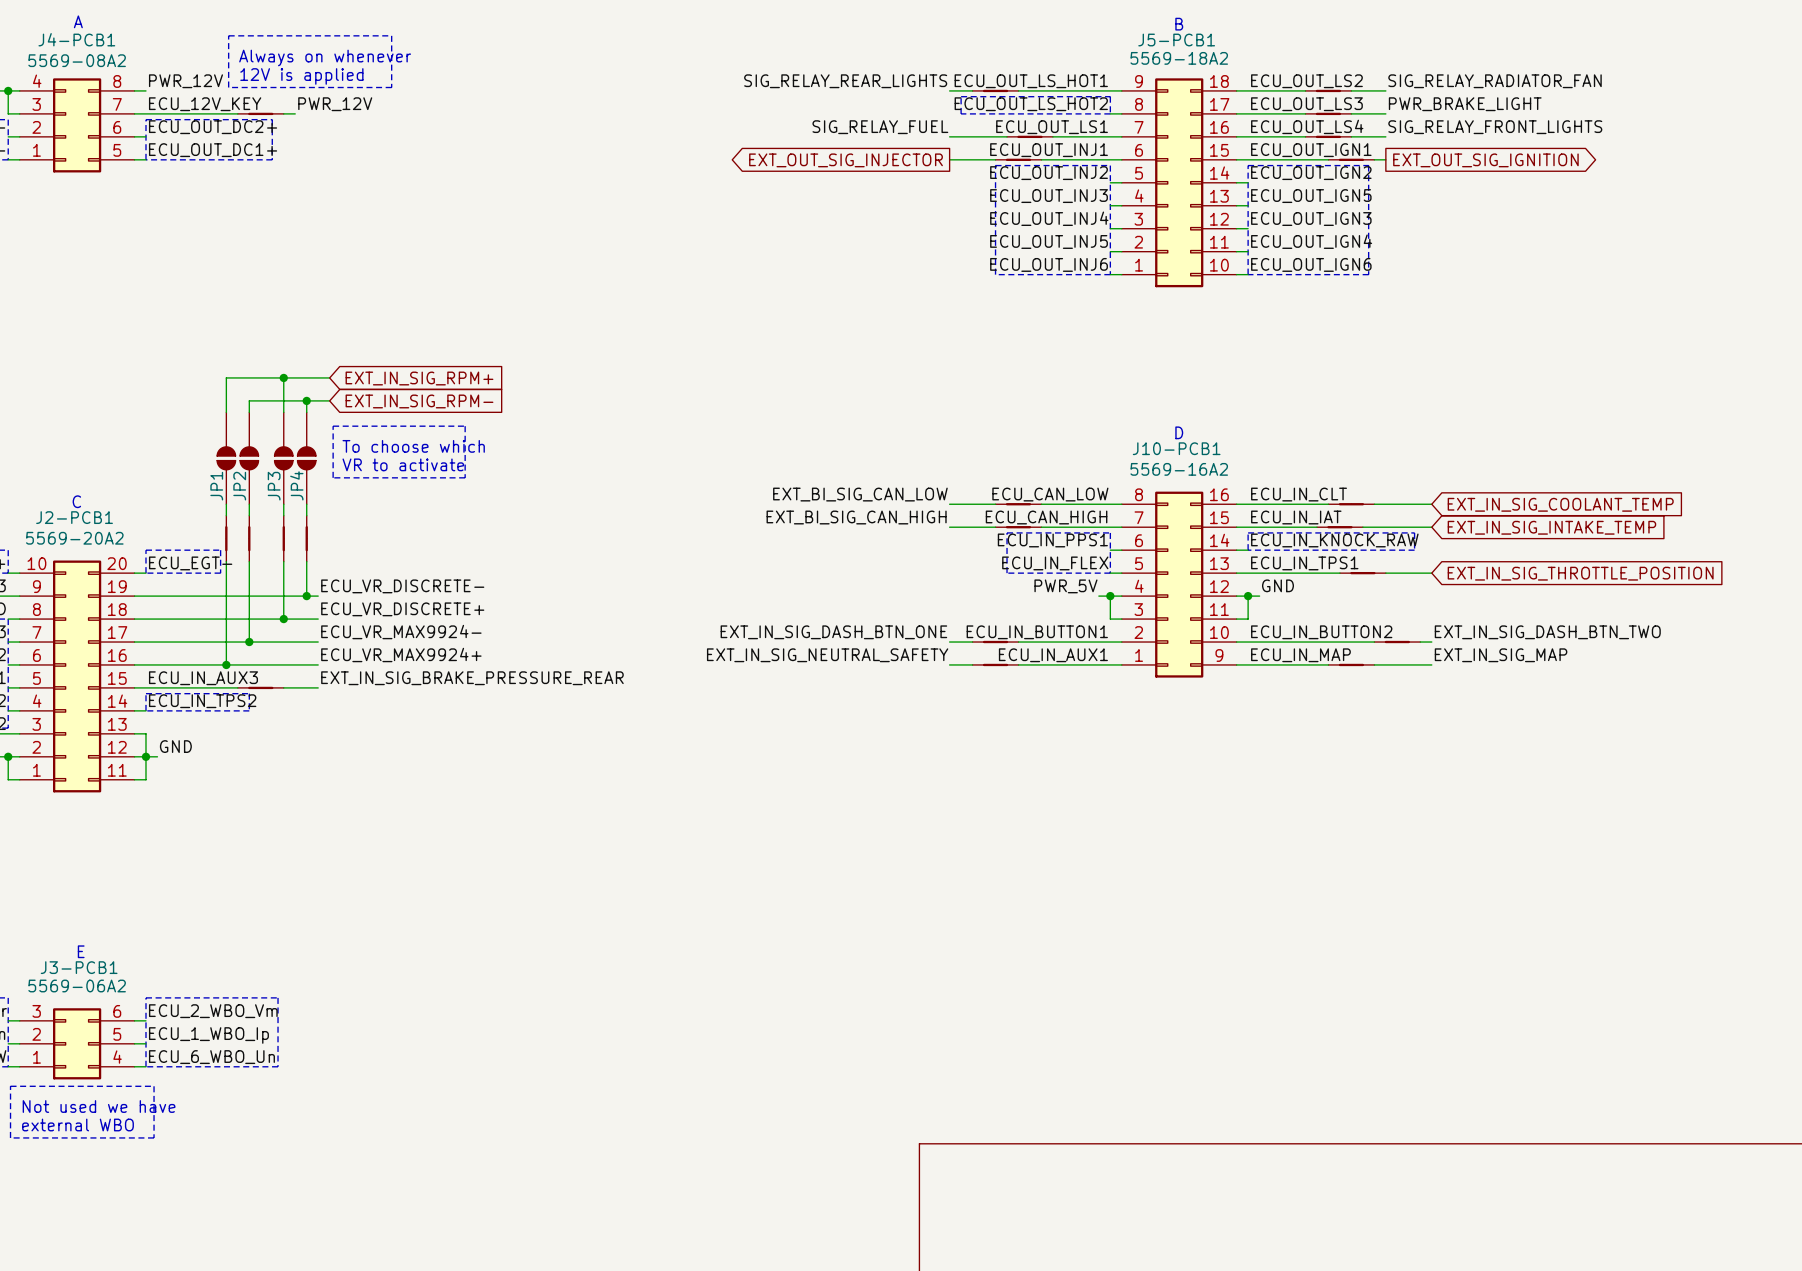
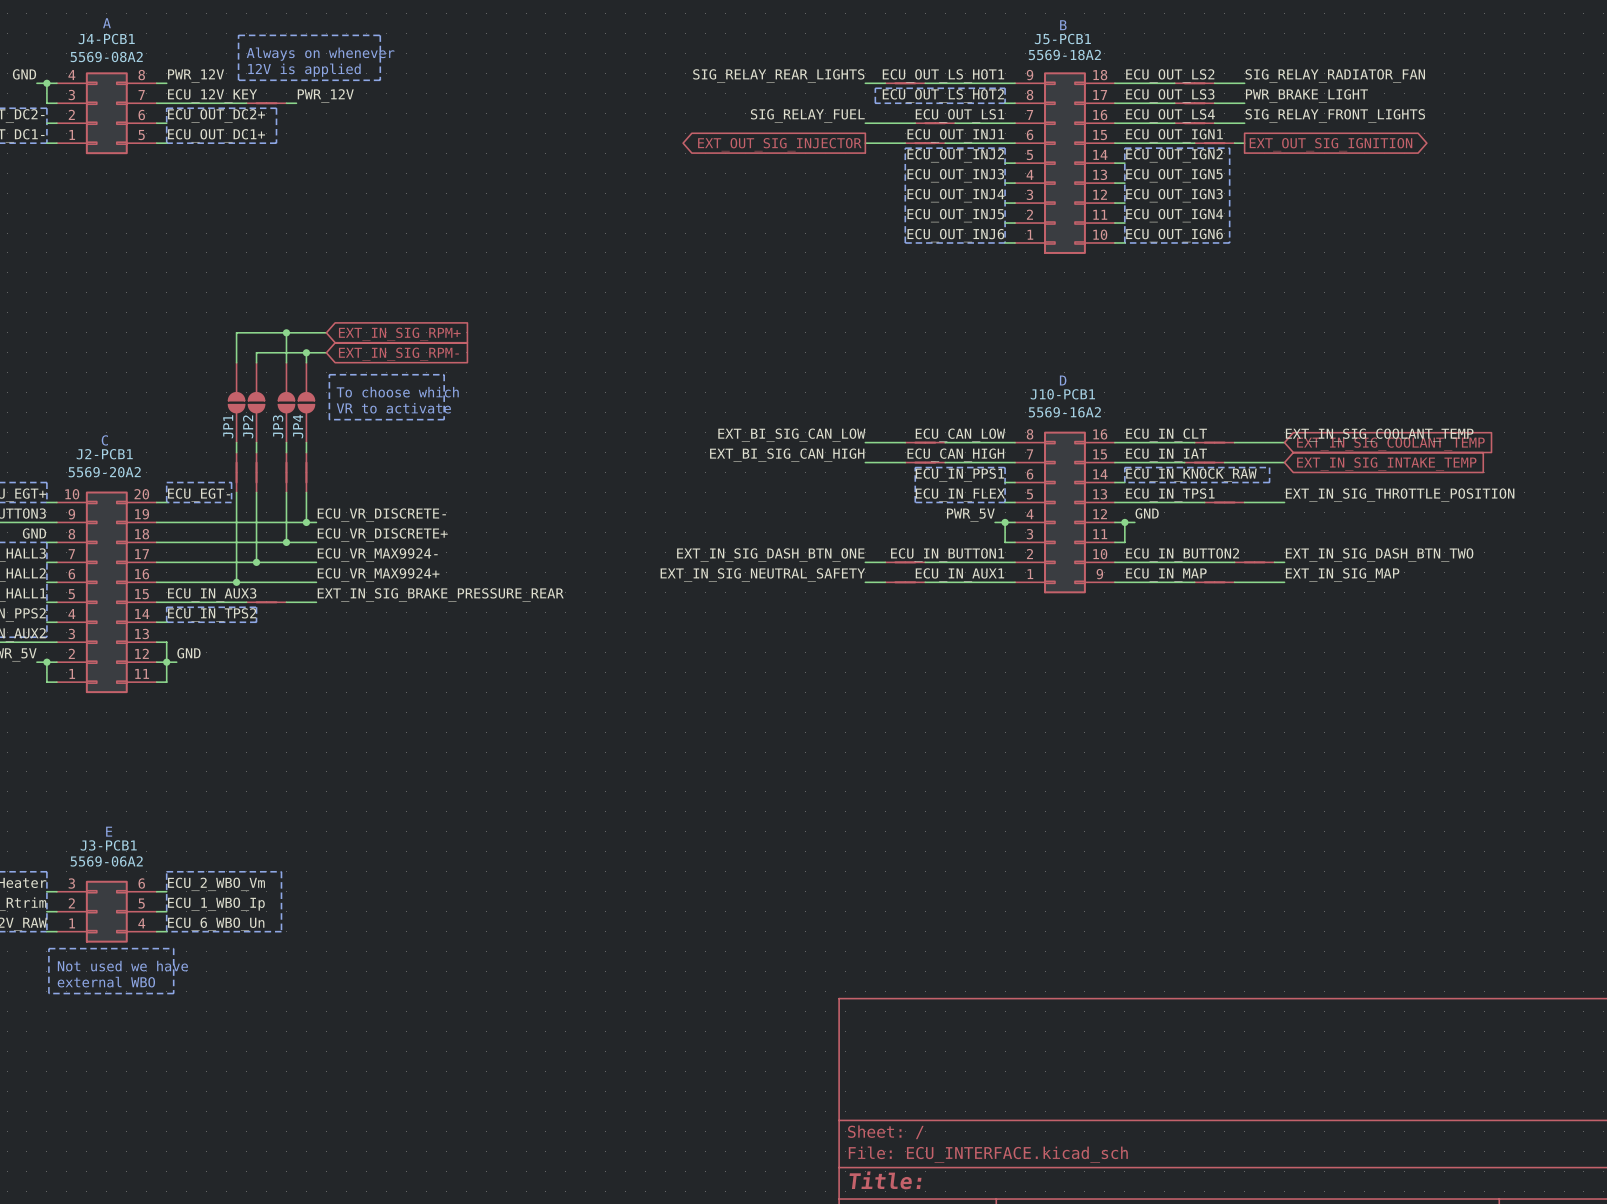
label: none -> EXT_IN_SIG_COOLANT_TEMP (1379, 435)
label: none -> EXT_IN_SIG_THROTTLE_POSITION (1400, 495)
global label: EXT_IN_SIG_THROTTLE_POSITION (1580, 573) -> none

